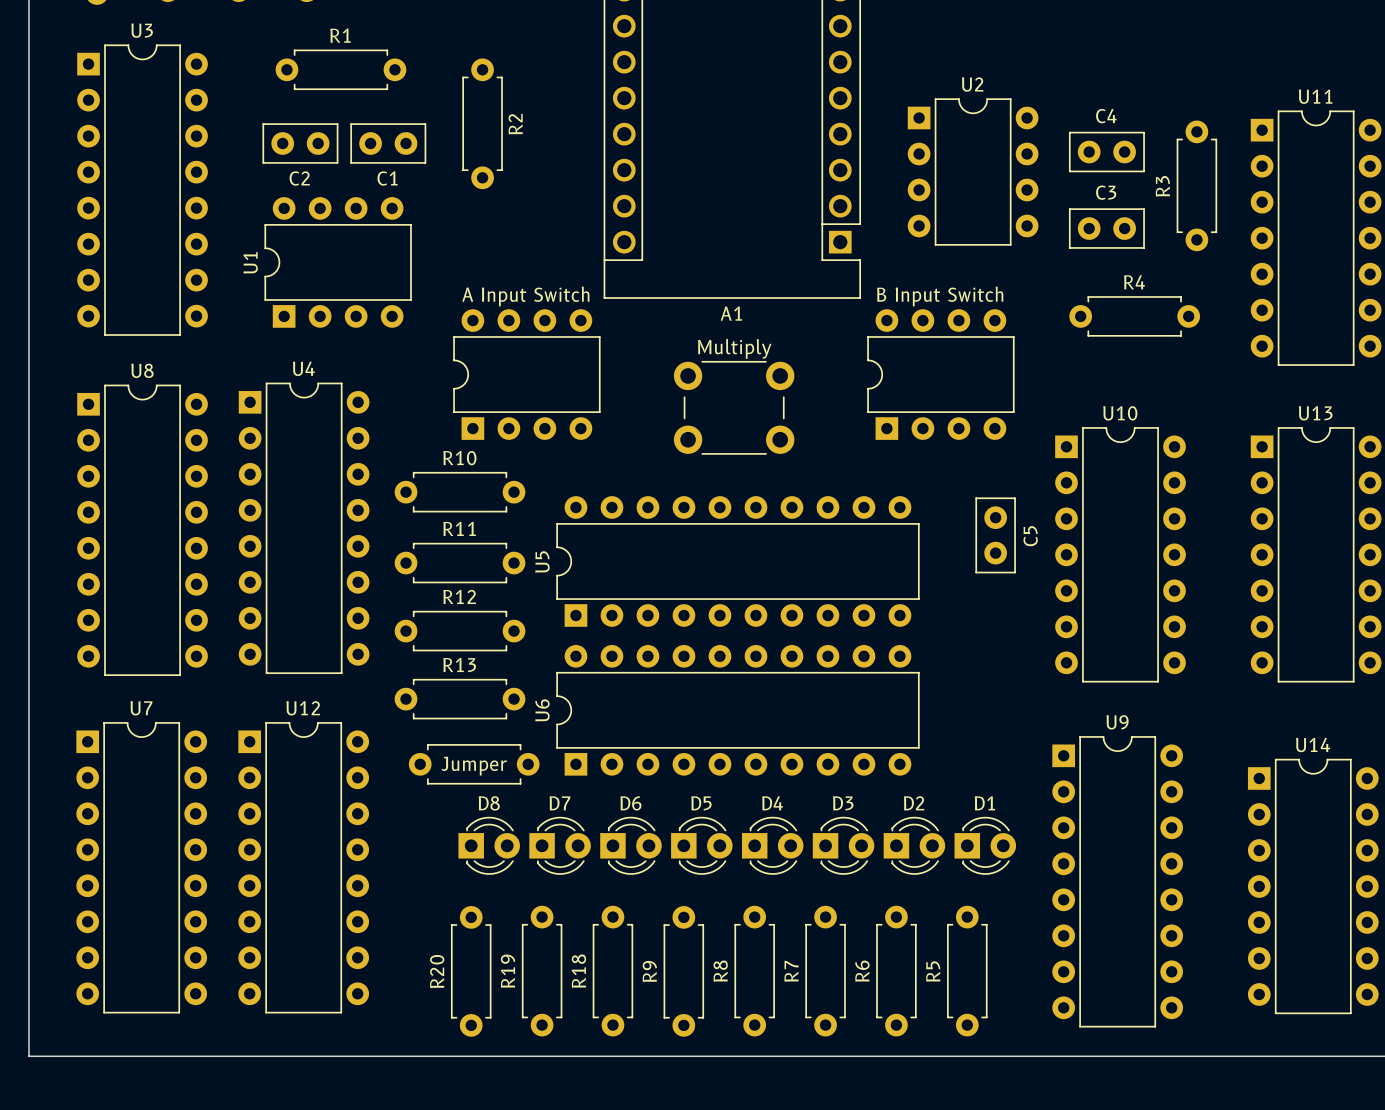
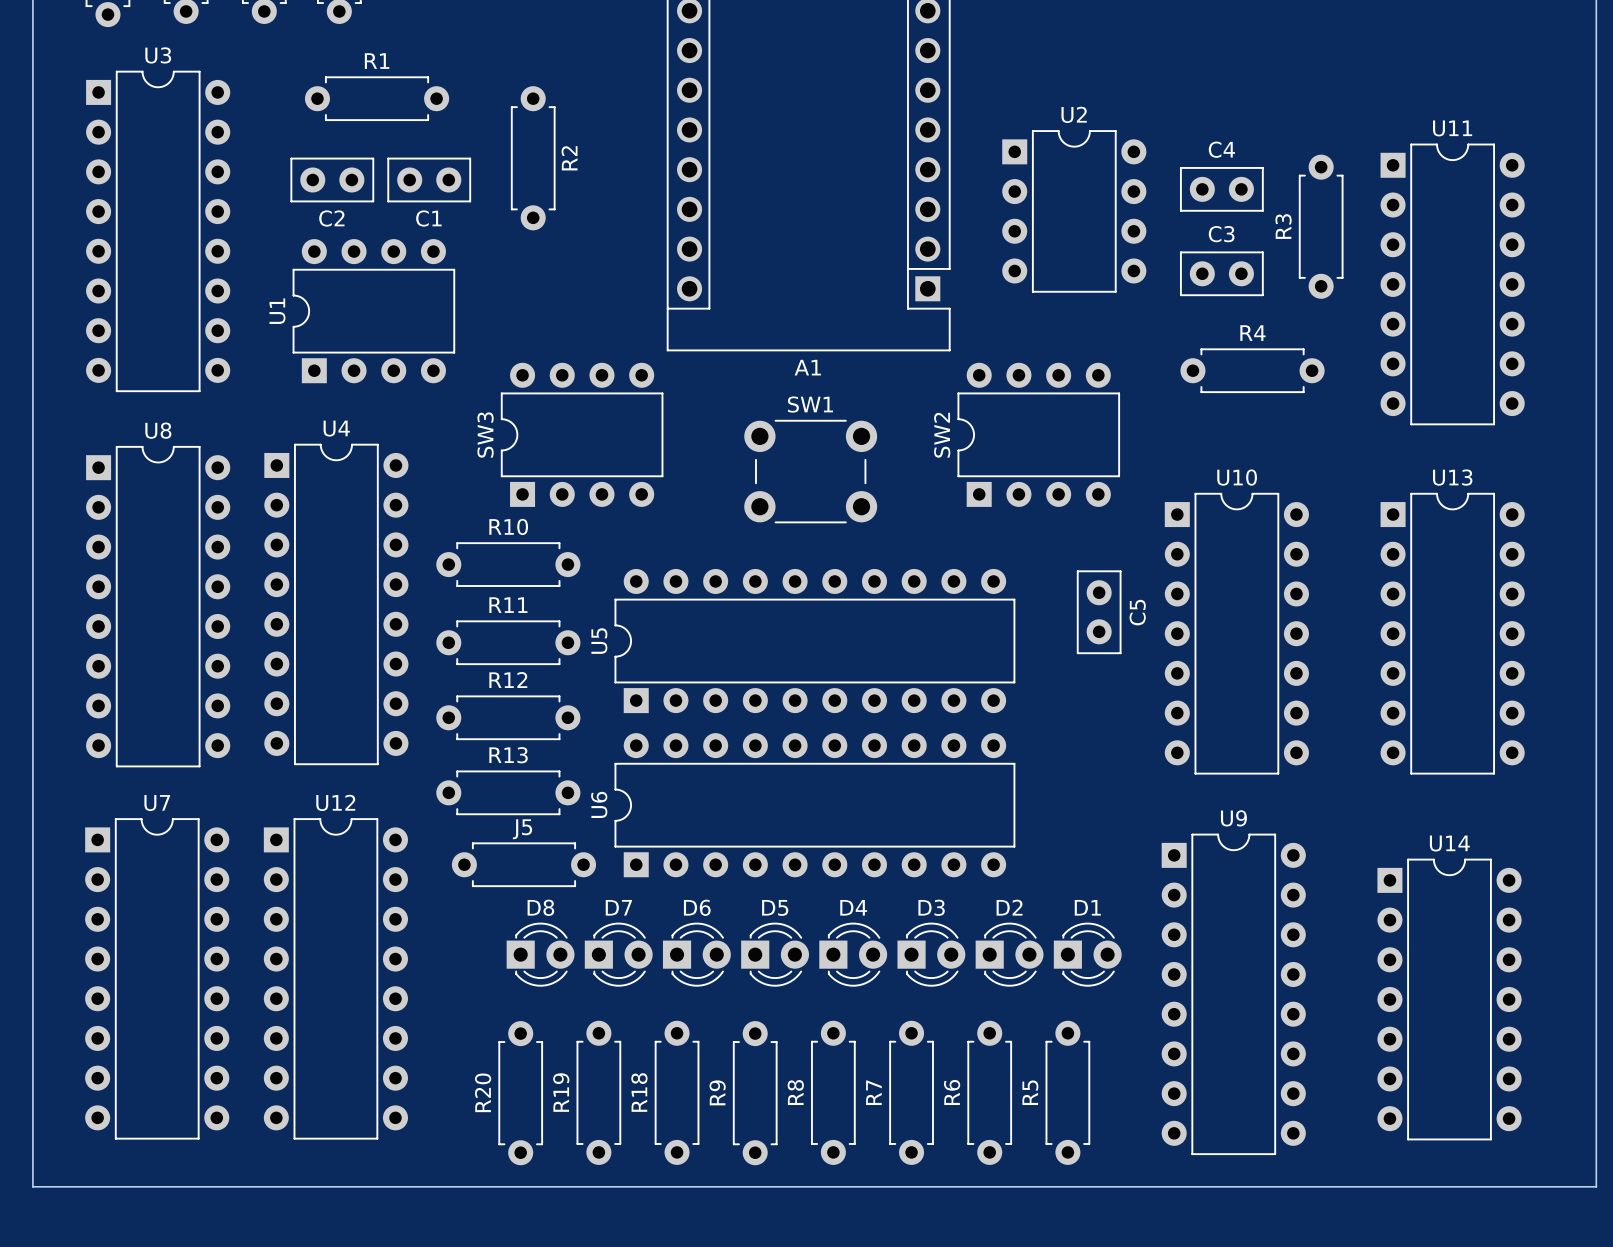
A Input Switch name: A Input Switch (525, 296) -> SW3 (485, 435)
B Input Switch name: B Input Switch (940, 296) -> SW2 (942, 435)
Multiply name: Multiply (734, 348) -> SW1 (810, 404)
Jumper name: Jumper (474, 766) -> J5 (522, 829)

